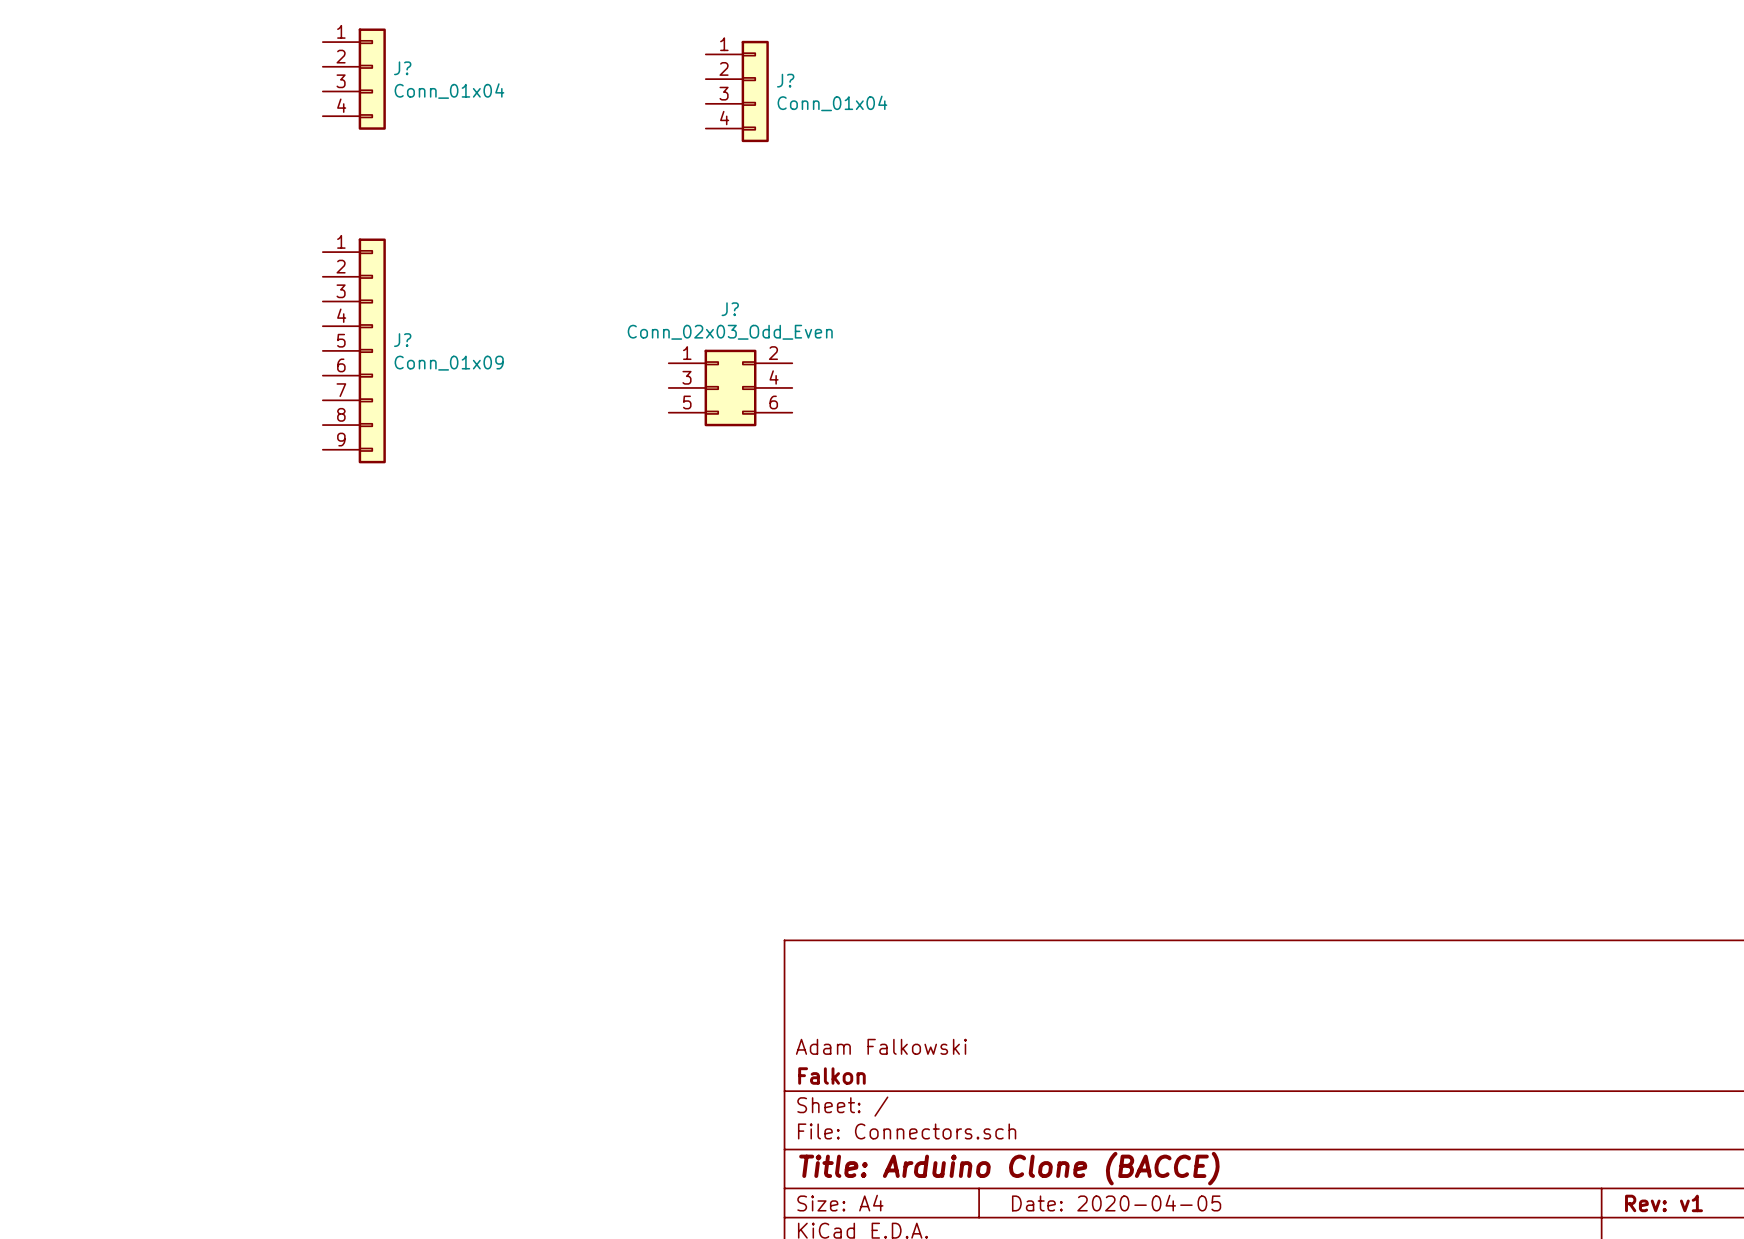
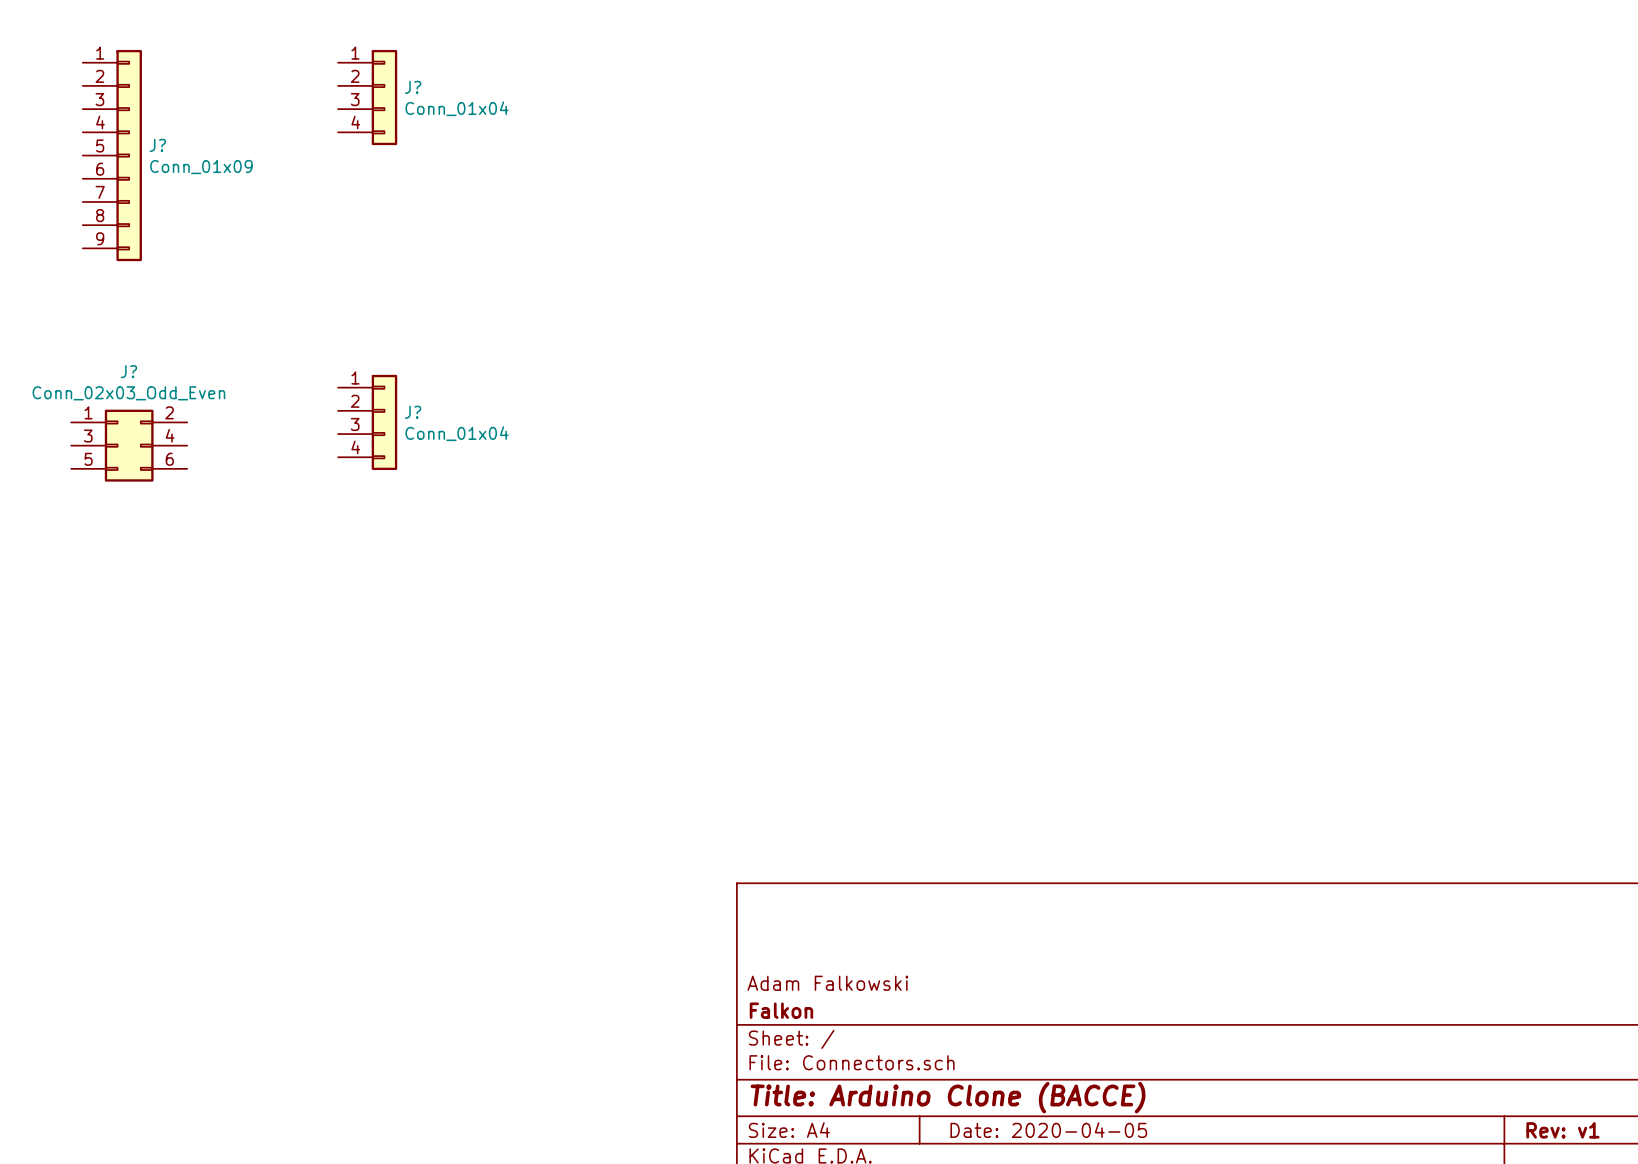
J? position: (354, 79) -> (367, 97)
J?: Conn_01x04 (737, 91) -> none
J?: none -> Conn_01x09 (112, 155)
J?: Conn_01x09 (354, 350) -> none
J?: Conn_02x03_Odd_Even (730, 387) -> none
J?: none -> Conn_01x04 (367, 422)
J?: none -> Conn_02x03_Odd_Even (129, 445)

